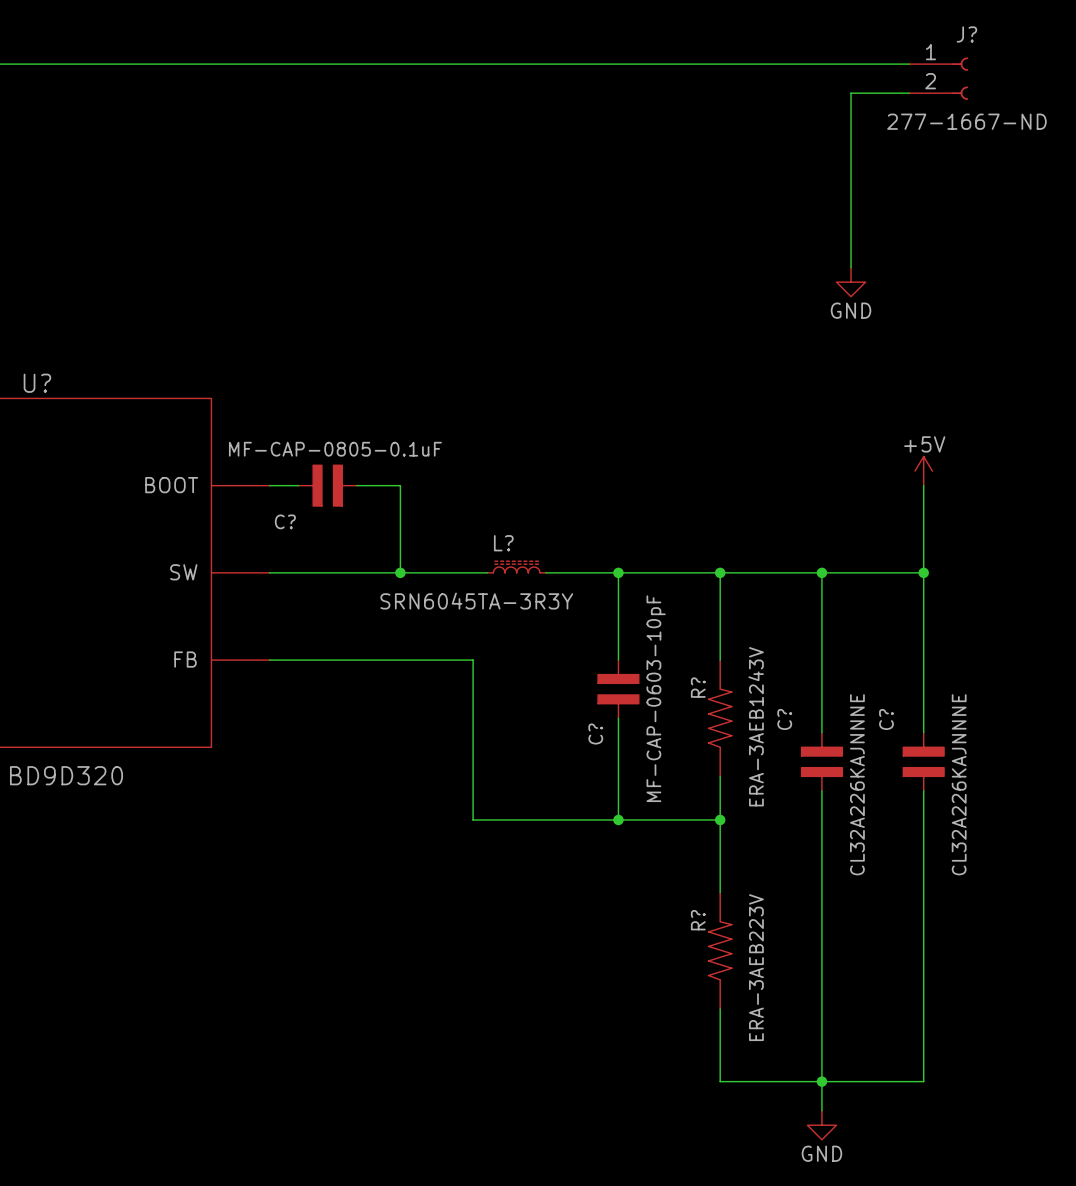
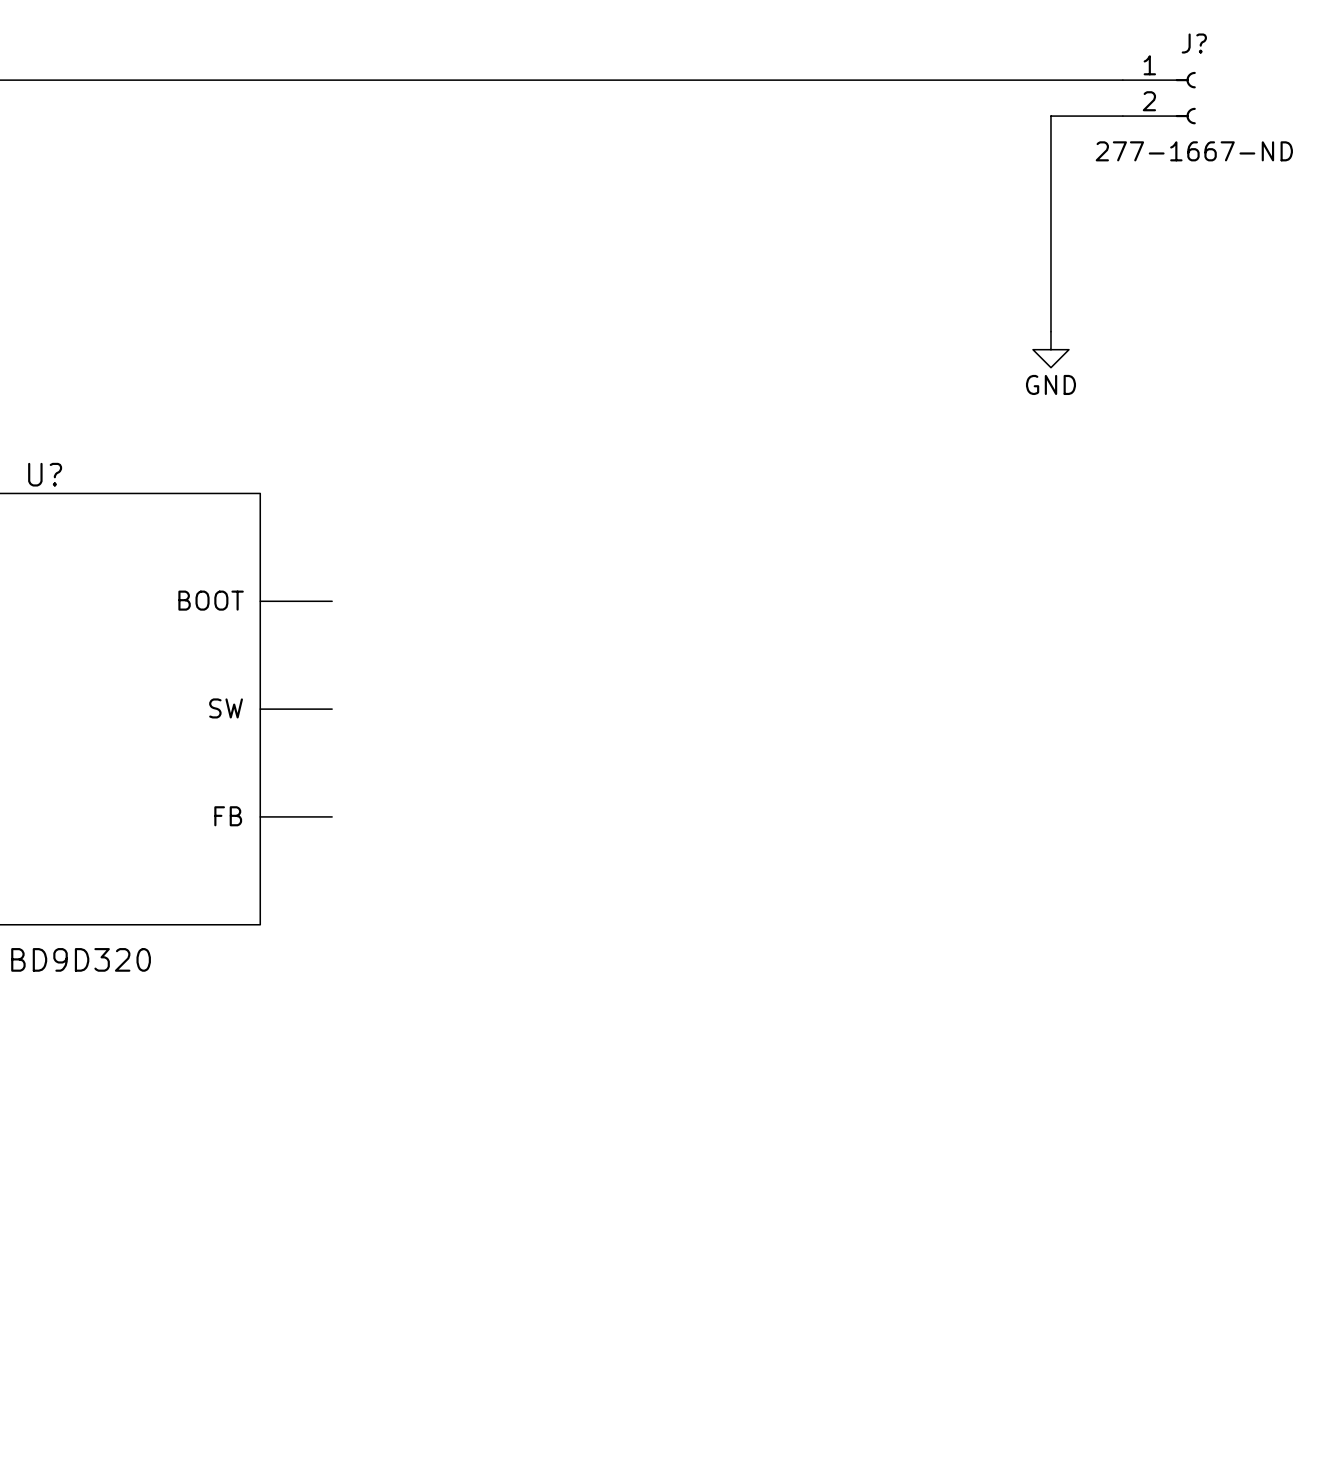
power symbol: +5V (923, 471) -> none
wire: (269, 485) (298, 485) -> none
C?: MF-CAP-0805-0.1uF (327, 485) -> none
wire: (356, 485) (400, 485) (400, 572) -> none
wire: (923, 485) (923, 732) -> none
L?: SRN6045TA-3R3Y (516, 567) -> none
wire: (269, 572) (487, 572) -> none
junction: (400, 572) -> none
wire: (545, 572) (923, 572) -> none
wire: (618, 572) (618, 660) -> none
junction: (618, 572) -> none
wire: (720, 572) (720, 660) -> none
junction: (720, 572) -> none
wire: (821, 572) (821, 732) -> none
junction: (821, 572) -> none
junction: (923, 572) -> none
wire: (269, 660) (473, 660) (473, 819) (720, 819) -> none
C?: MF-CAP-0603-10pF (618, 689) -> none
wire: (618, 718) (618, 819) -> none
R?: ERA-3AEB1243V (720, 718) -> none
C?: CL32A226KAJNNNE (821, 761) -> none
C?: CL32A226KAJNNNE (923, 761) -> none
wire: (720, 776) (720, 892) -> none
wire: (821, 790) (821, 1110) -> none
wire: (923, 790) (923, 1081) (720, 1081) (720, 1008) -> none
junction: (618, 819) -> none
junction: (720, 819) -> none
R?: ERA-3AEB223V (720, 950) -> none
junction: (821, 1081) -> none
power symbol: GND (821, 1125) -> none

